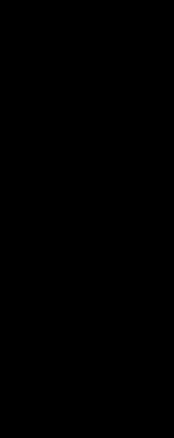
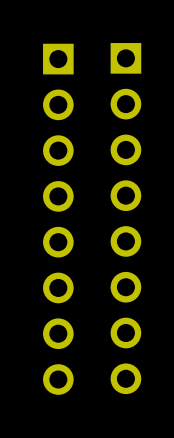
part: none -> (125, 218)
part: none -> (58, 219)

